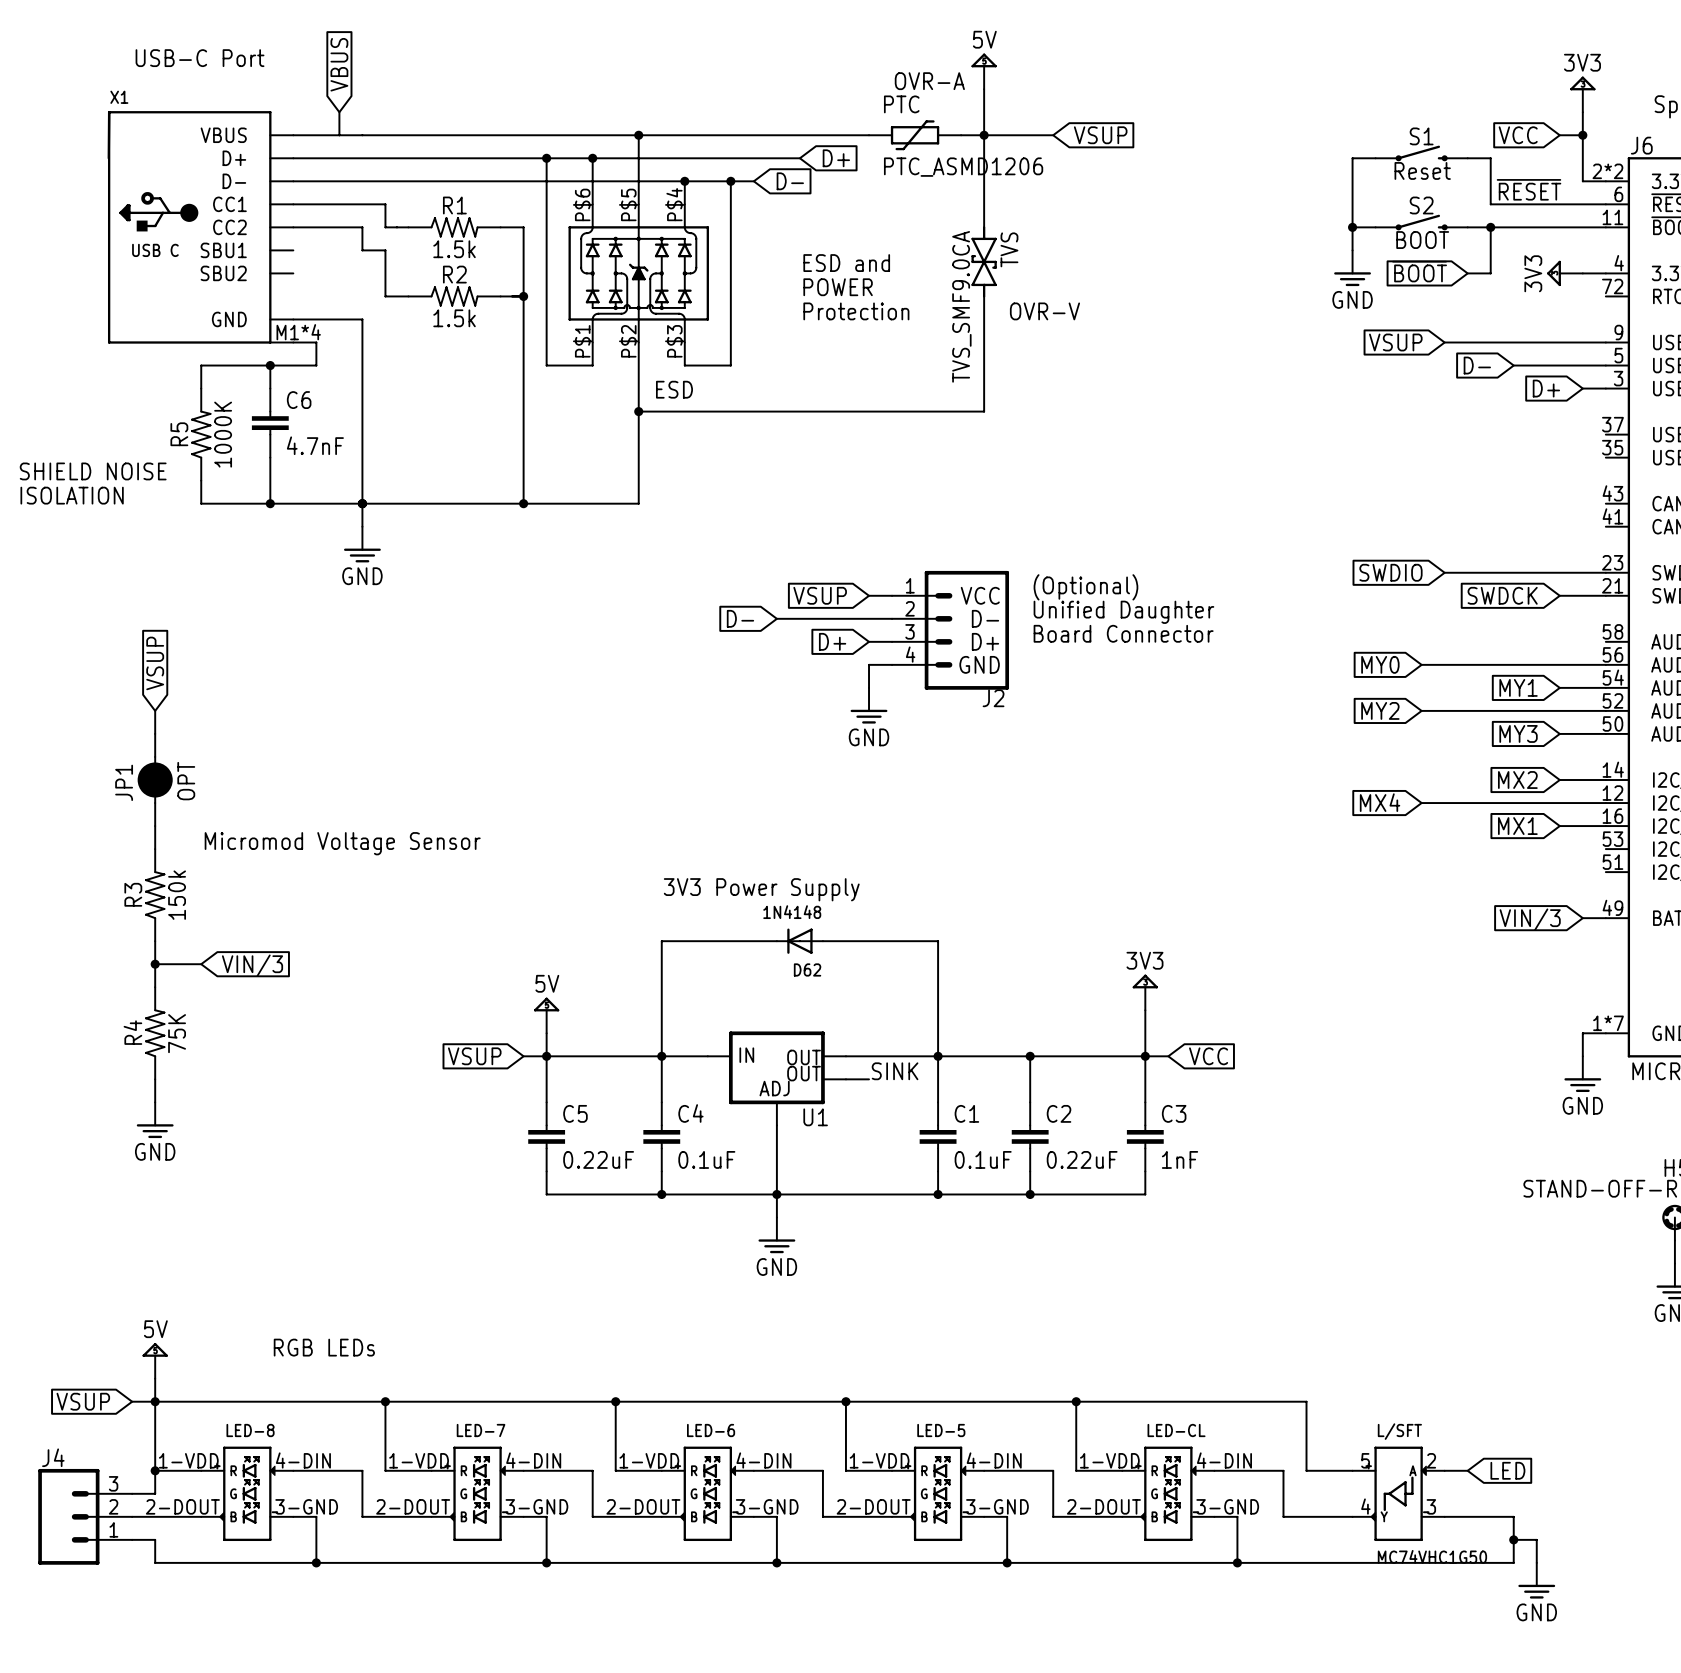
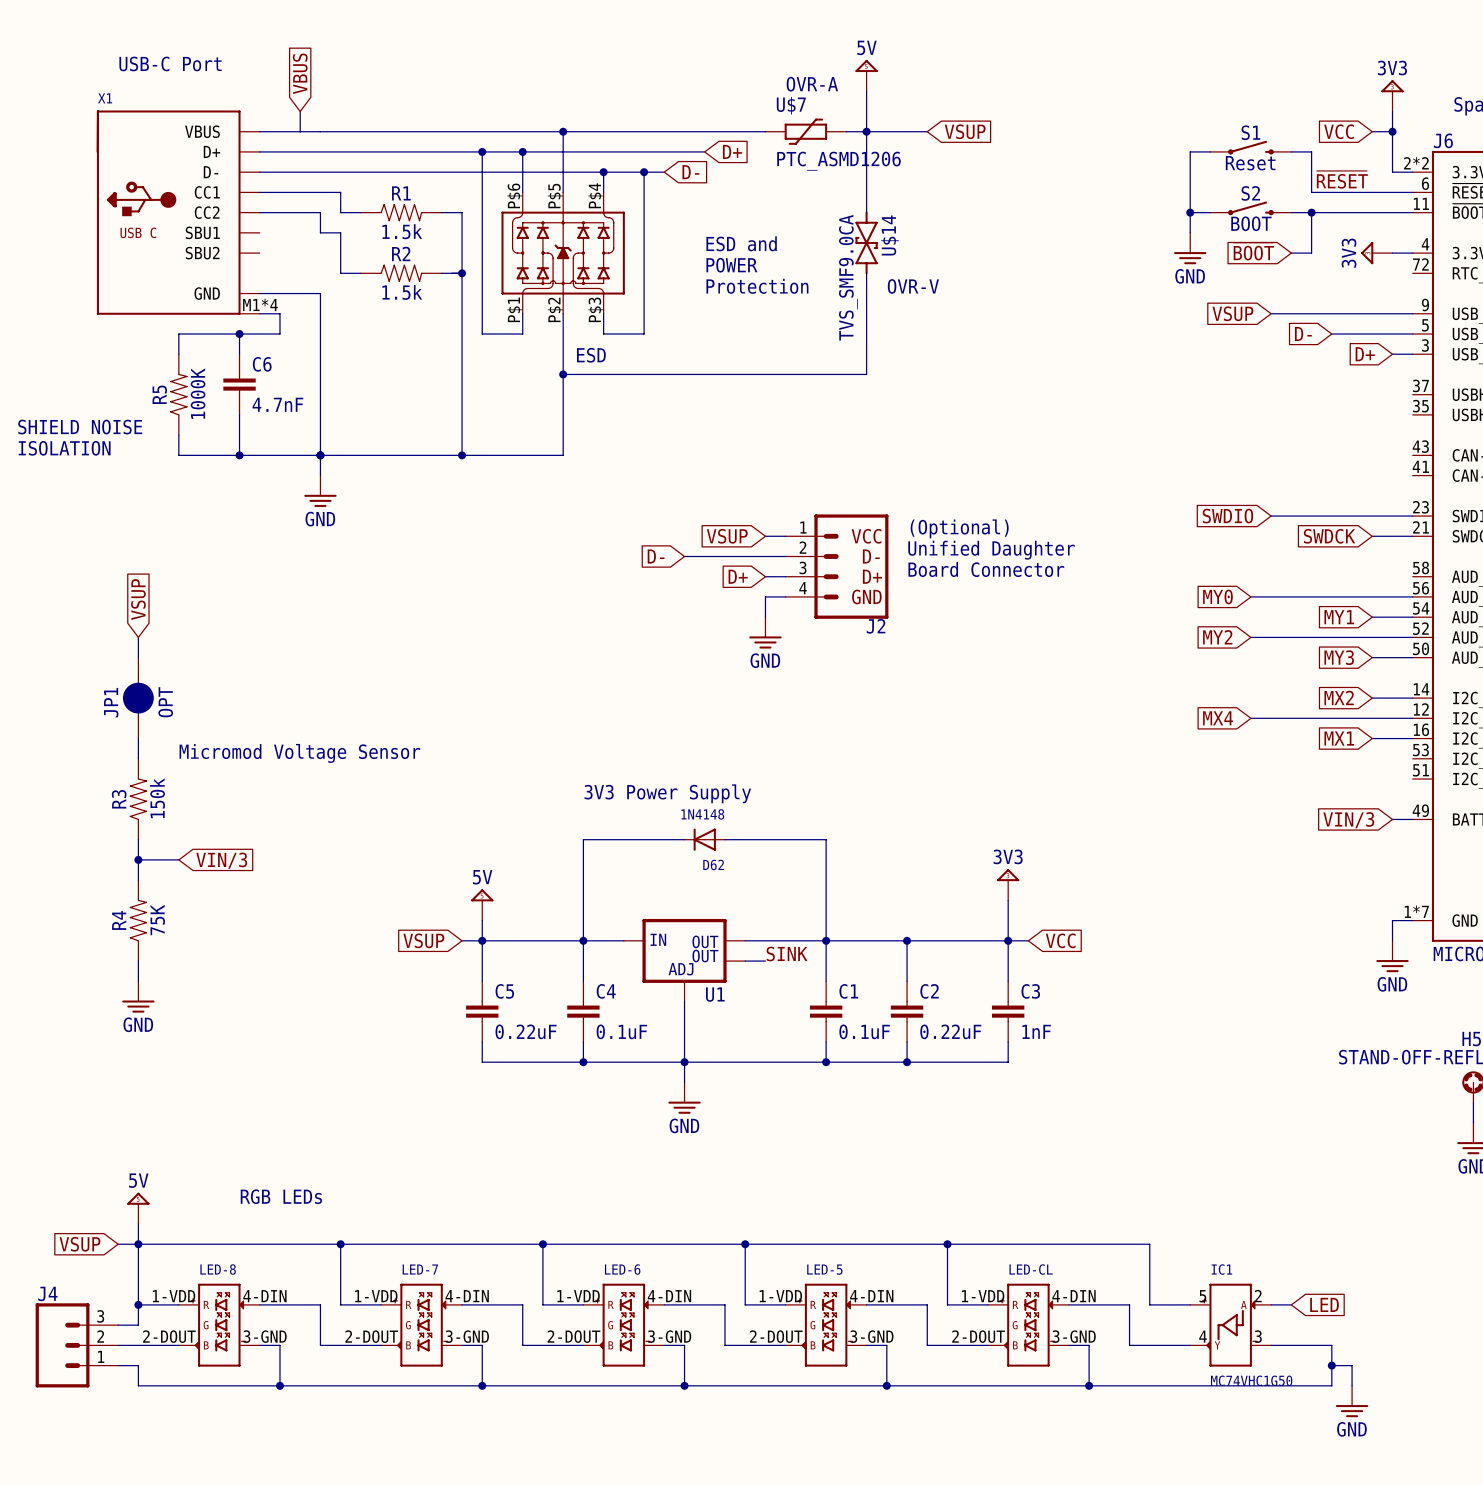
PTC name: PTC (901, 104) -> U$7 (791, 105)
TVS name: TVS (1009, 249) -> U$14 (889, 235)
L/SFT name: L/SFT (1399, 1431) -> IC1 (1221, 1269)

